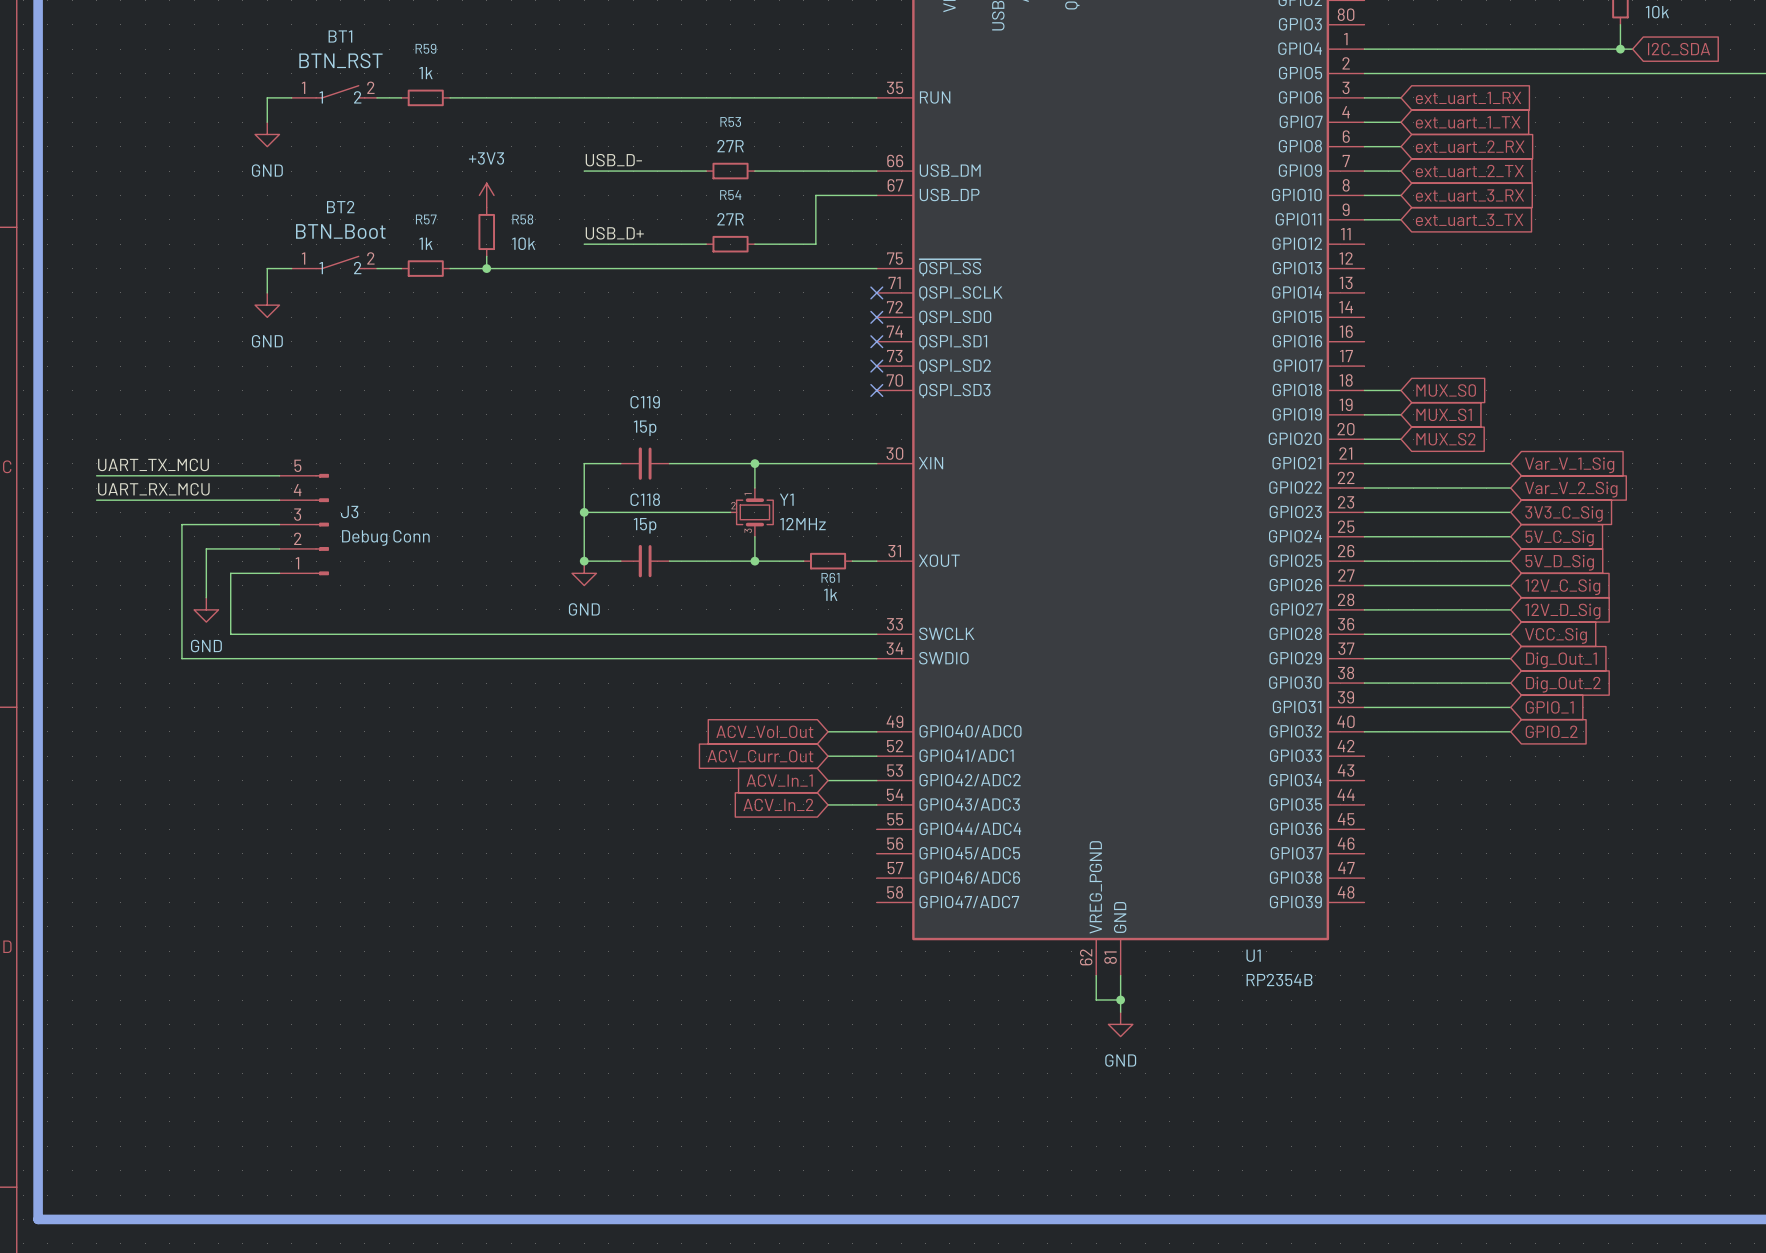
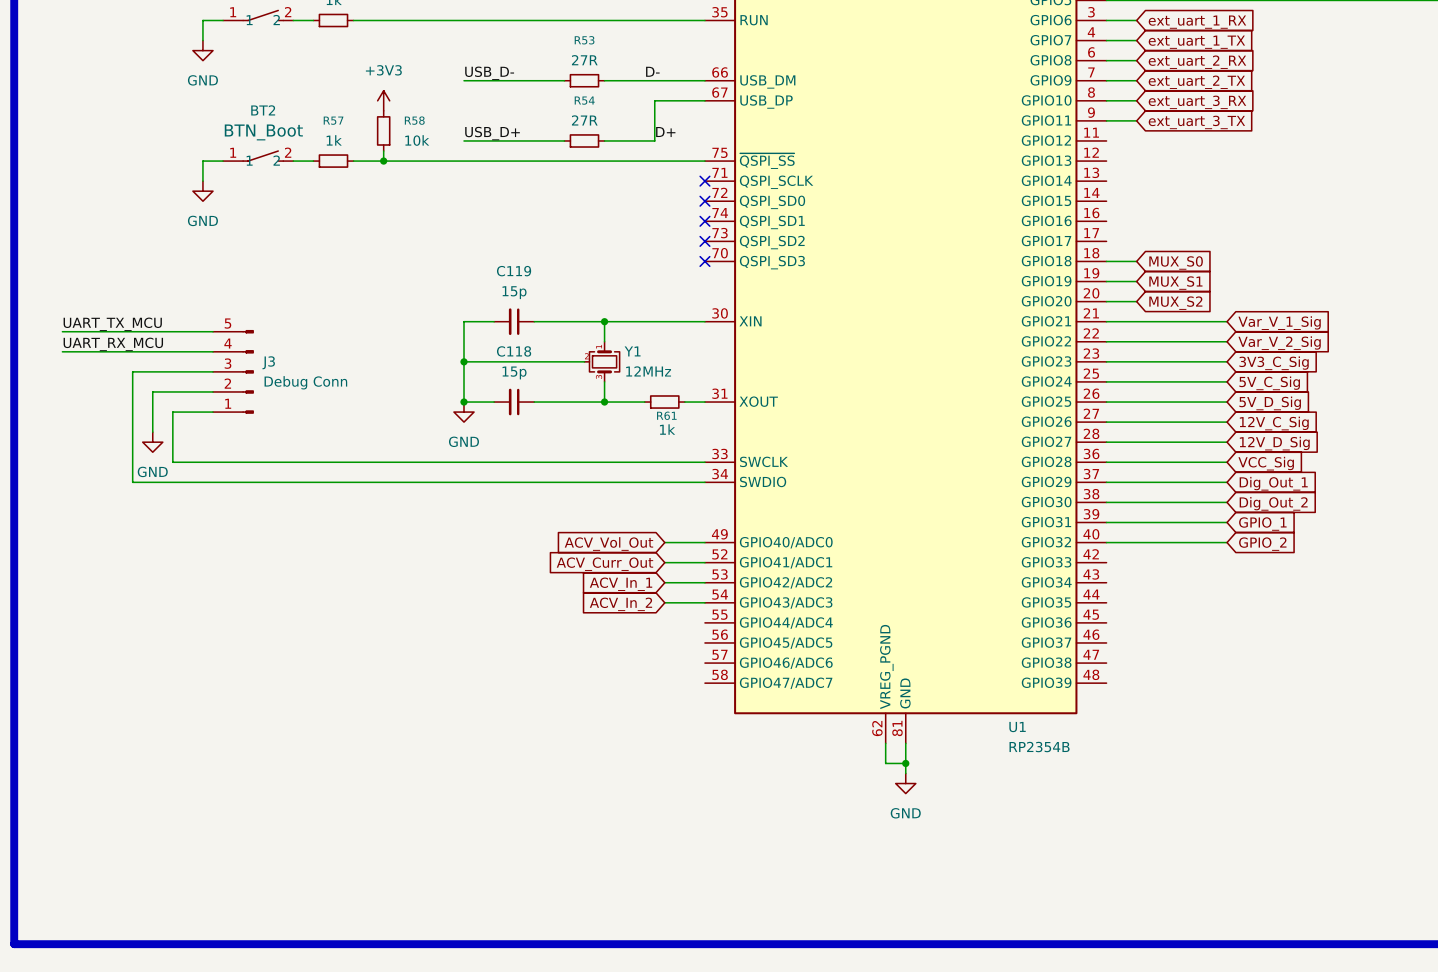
label: none -> D- (652, 71)
label: none -> D+ (665, 132)

